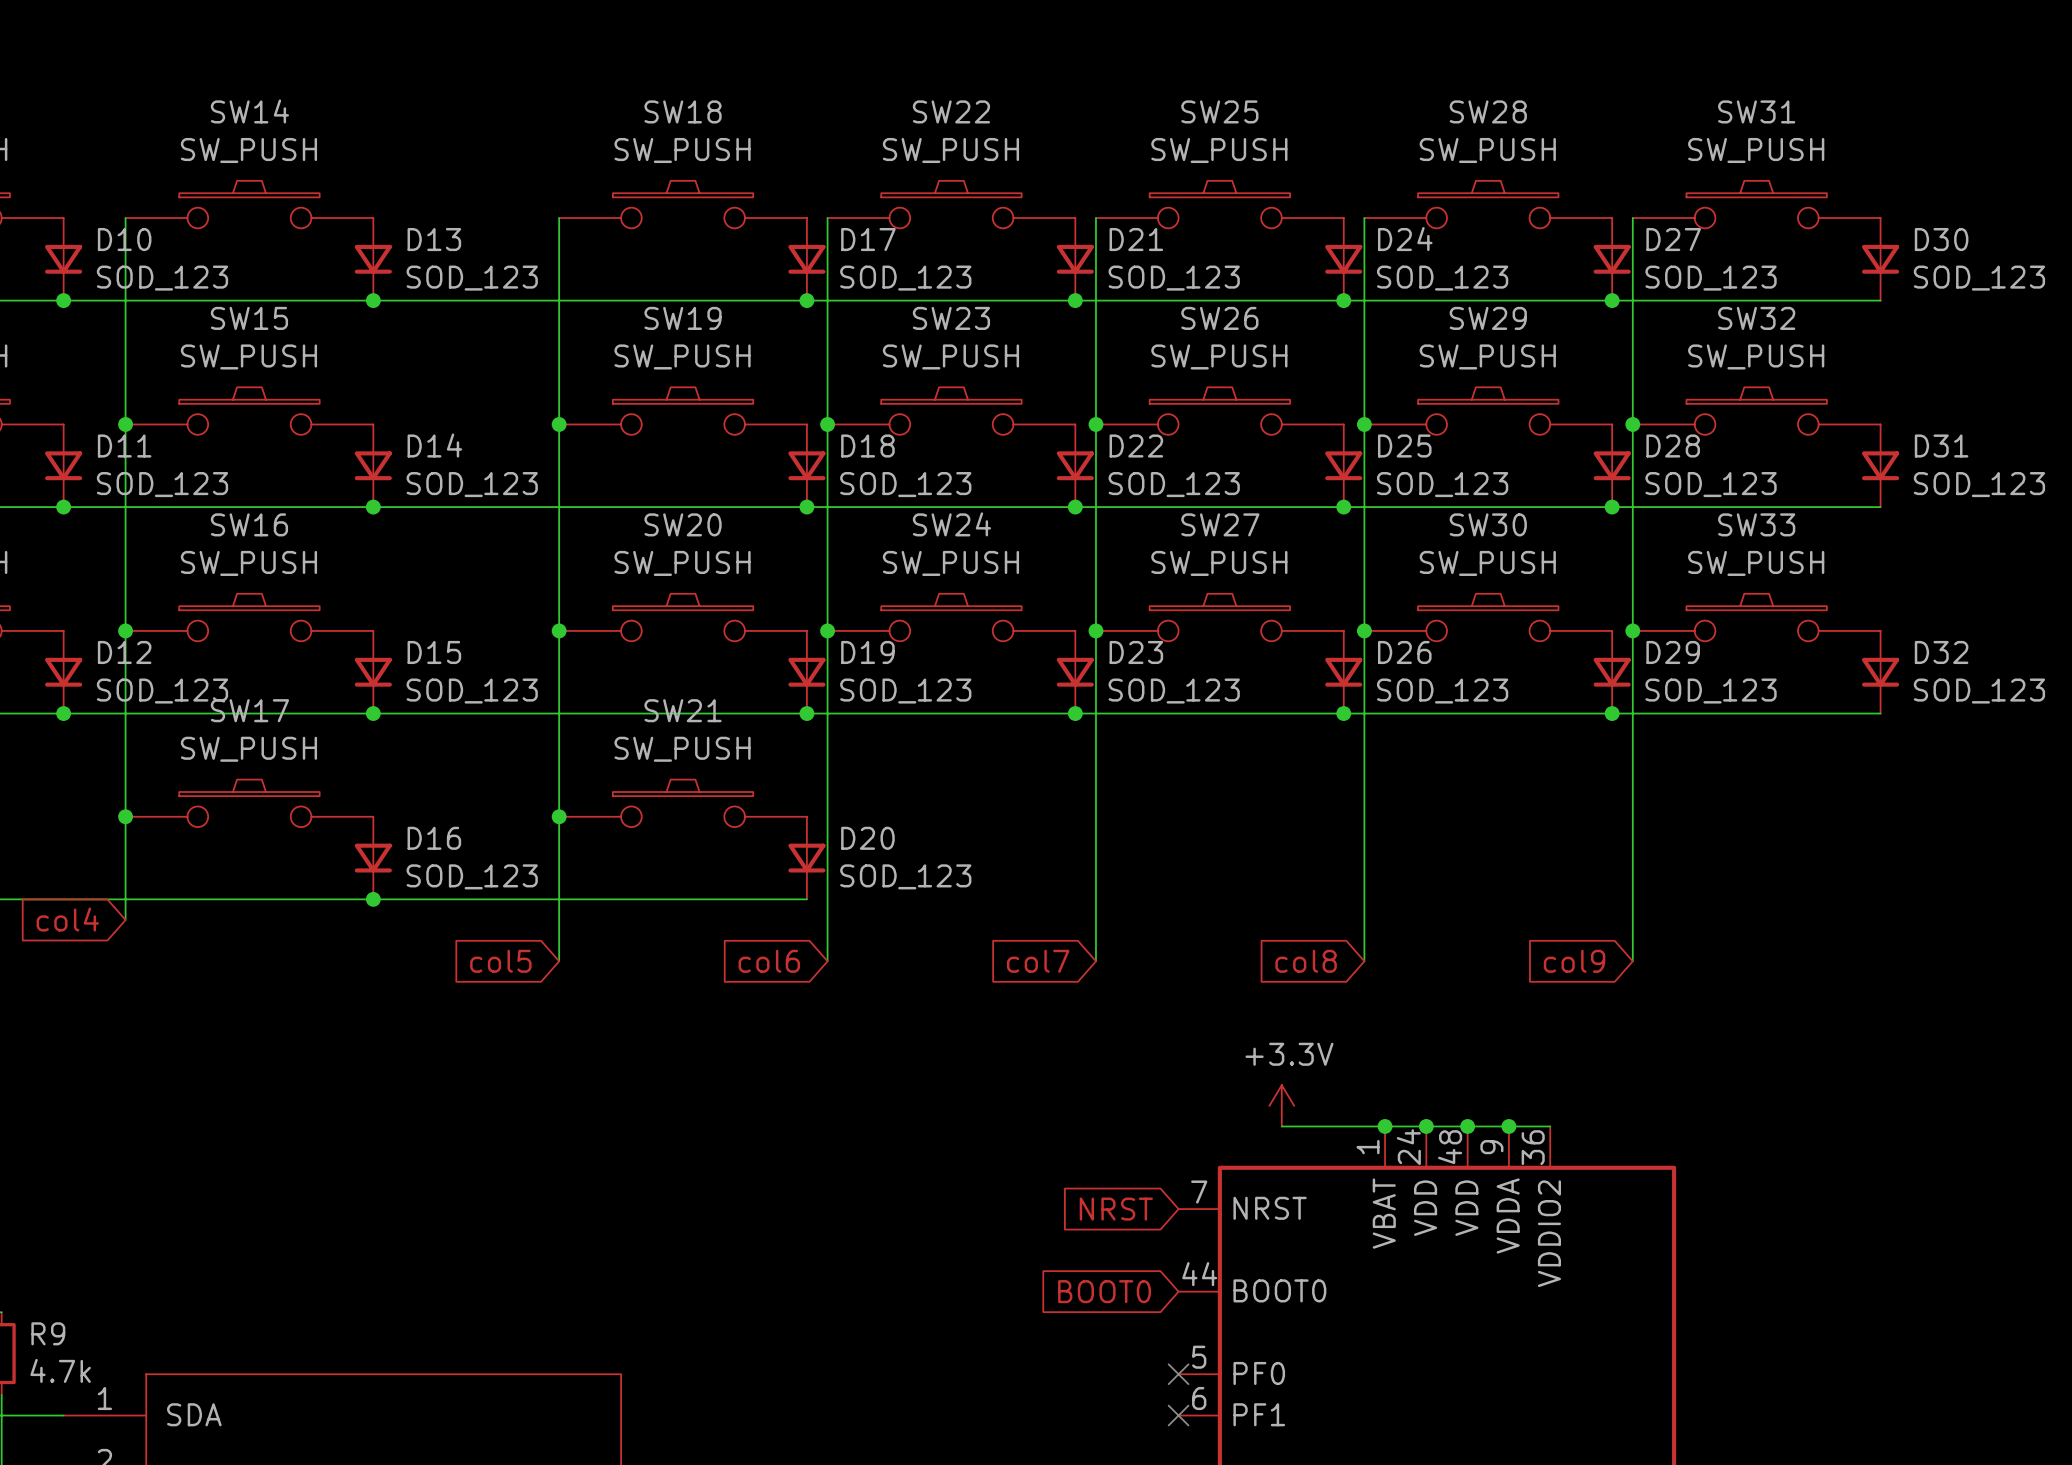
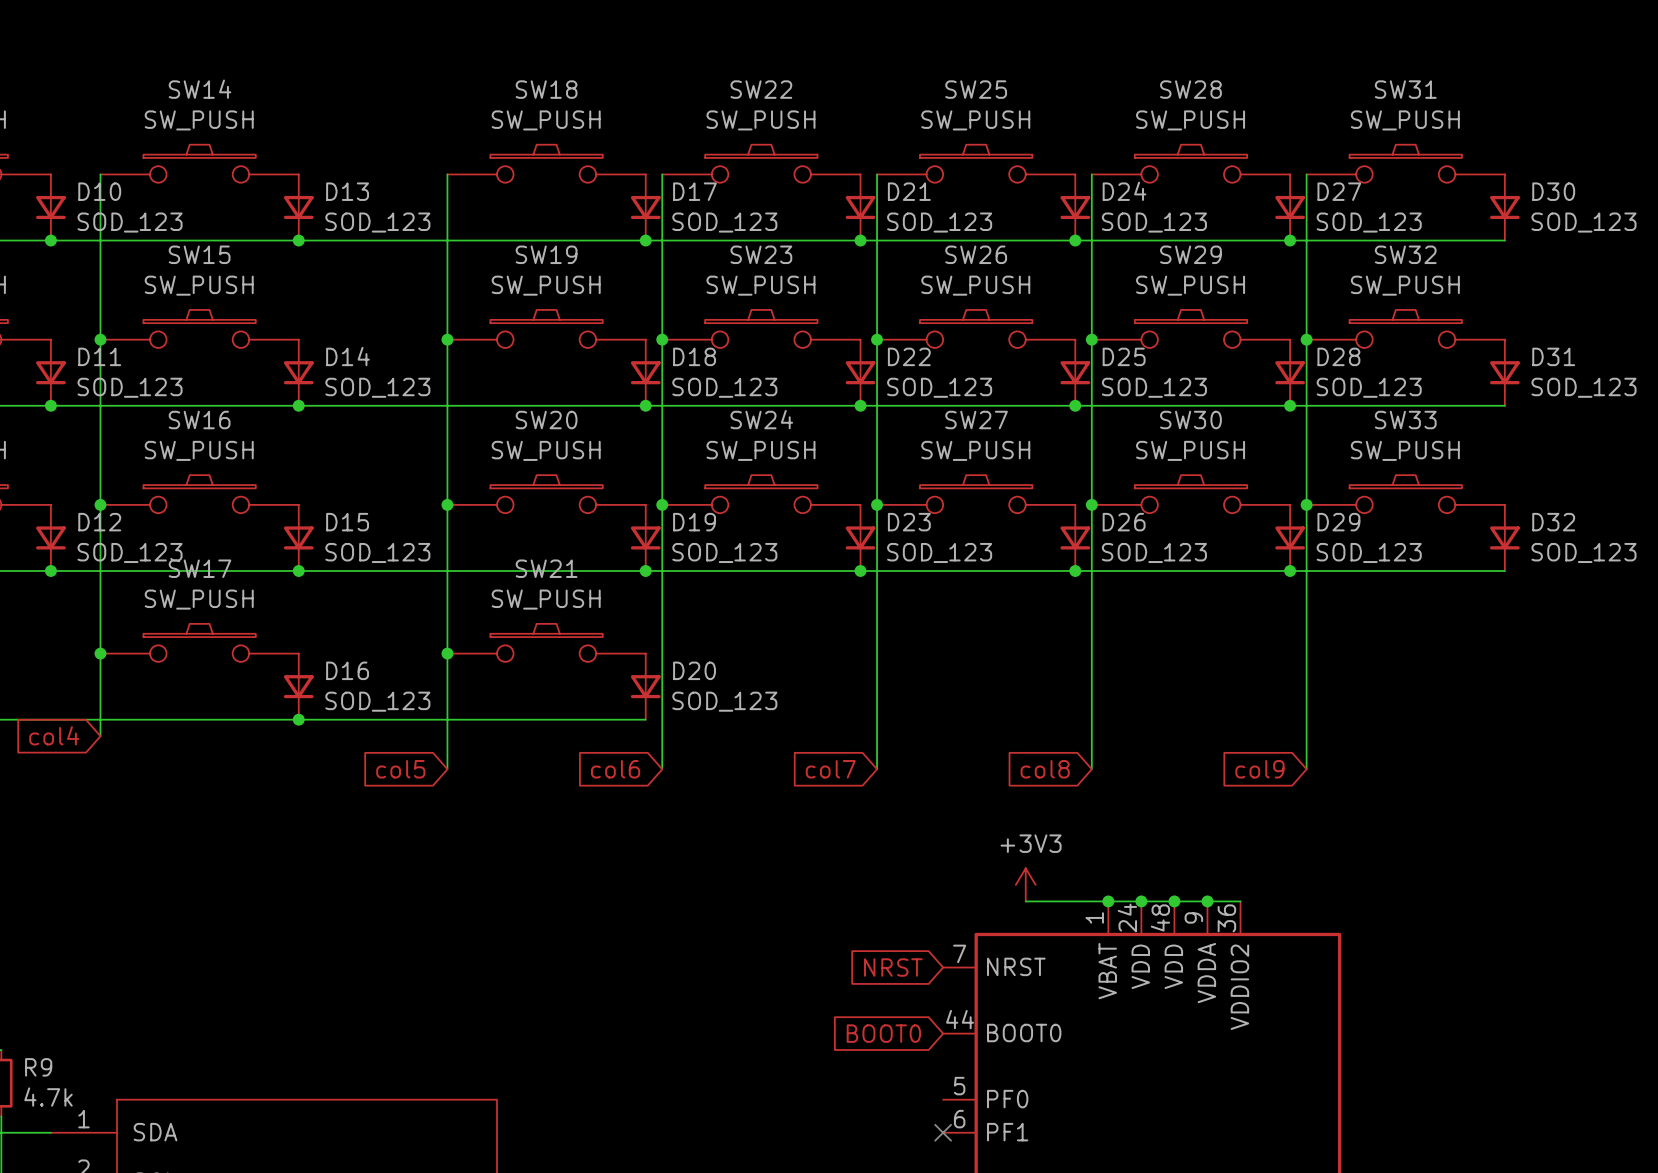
power symbol: +3.3V (1281, 1105) -> +3V3 (1025, 884)
no-connect mark: (1178, 1374) -> none

